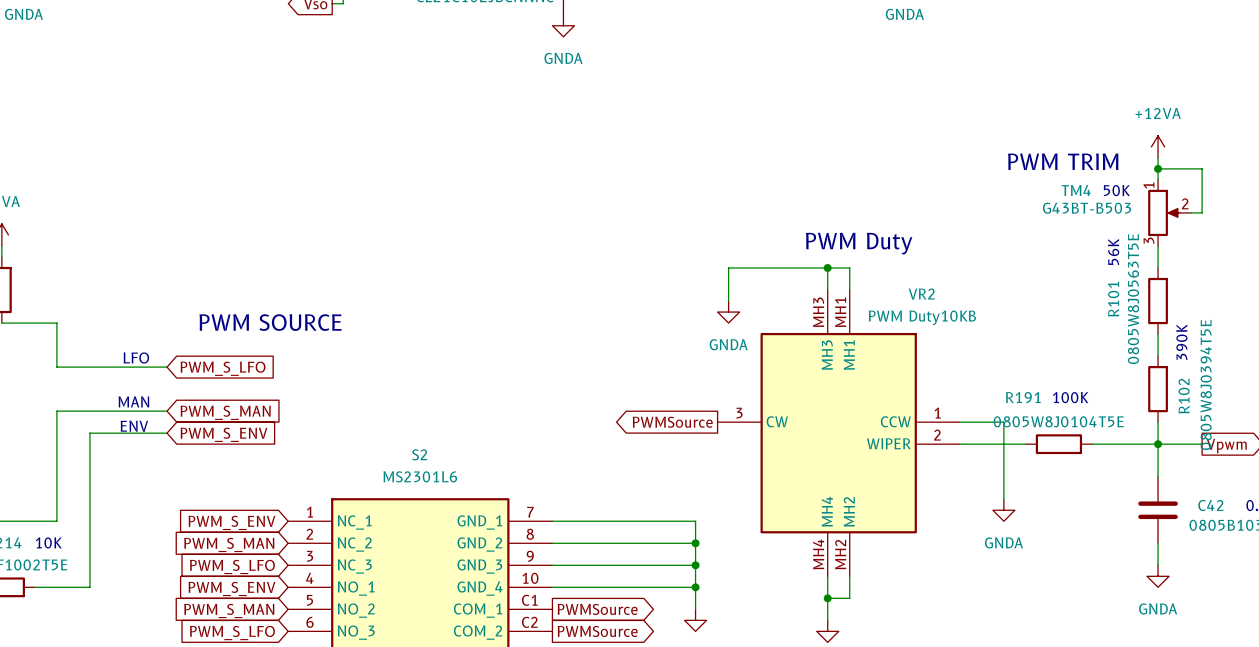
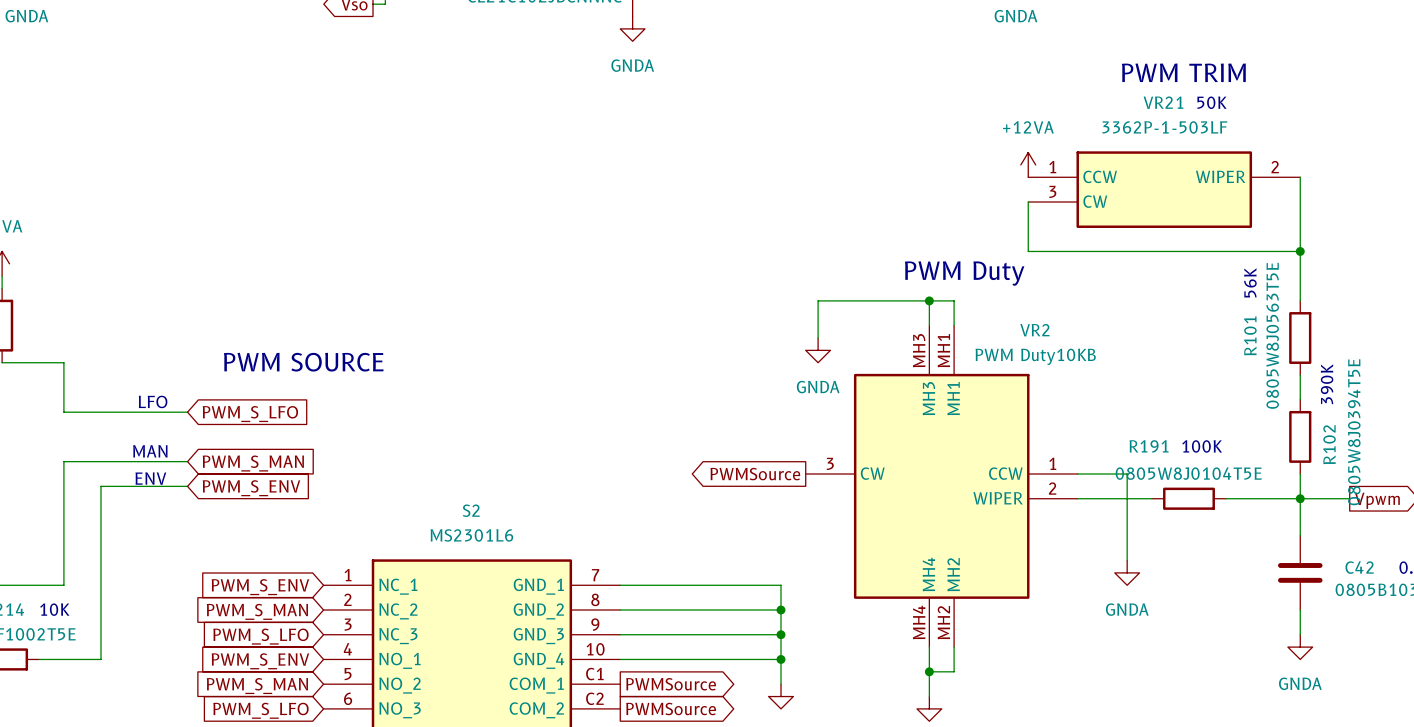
power symbol: none -> +12VA (1028, 164)
power symbol: +12VA (1158, 146) -> none
text position: PWM TRIM (1063, 161) -> PWM TRIM (1183, 72)
VR21: none -> 3362P-1-503LF (1164, 189)
wire: (1158, 168) (1202, 168) (1202, 212) (1191, 212) -> none
junction: (1158, 168) -> none
wire: none -> (1028, 202) (1028, 251) (1300, 251)
wire: none -> (1300, 202) (1300, 276)
text position: 50K (1116, 190) -> 50K (1212, 102)
TM4: G43BT-B503 (1169, 212) -> none
junction: none -> (1300, 251)

